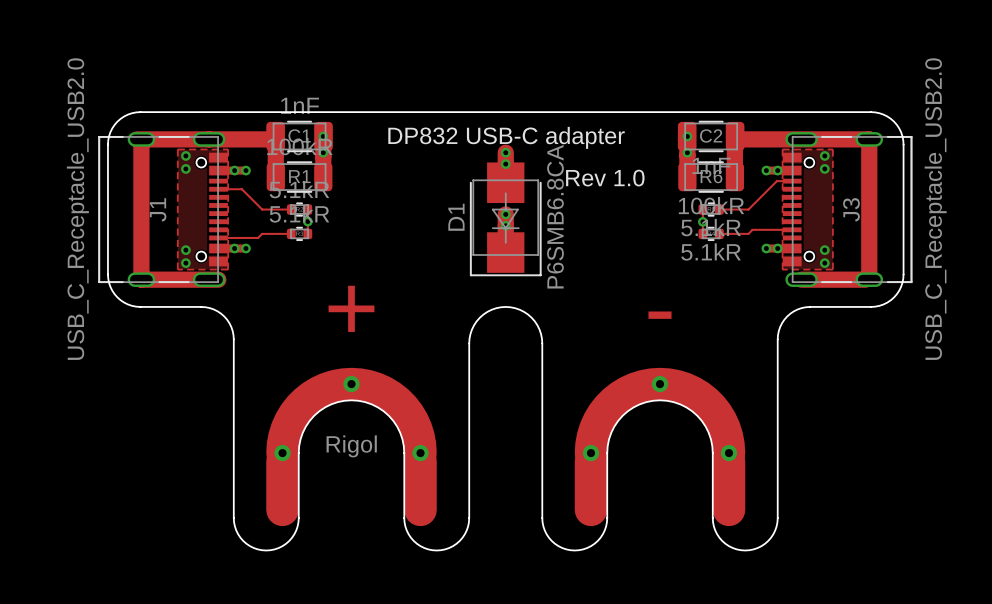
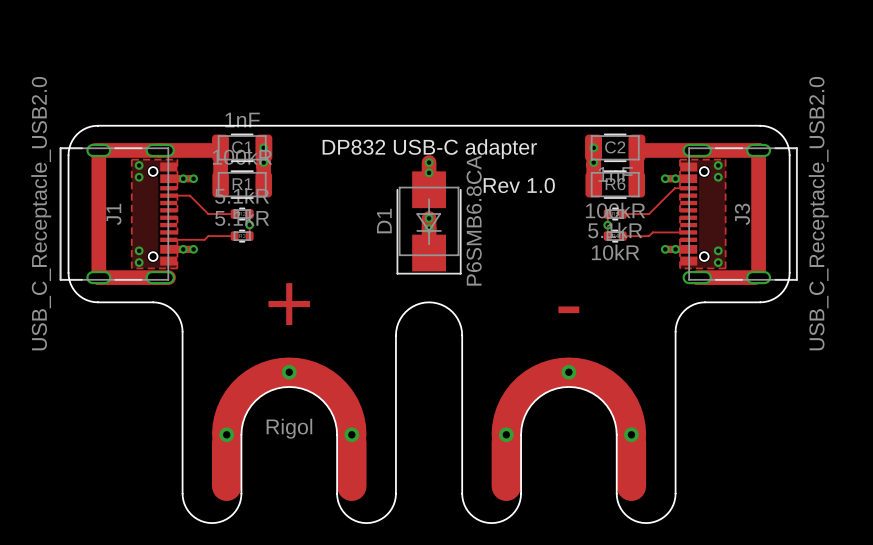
part value: 5.1kR (711, 251) -> 10kR (615, 252)

